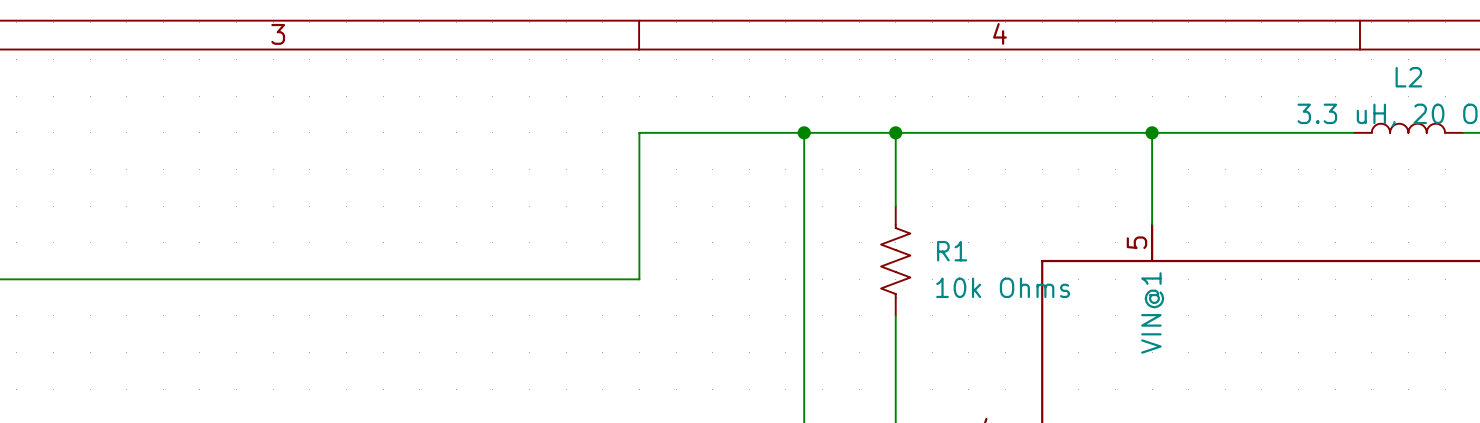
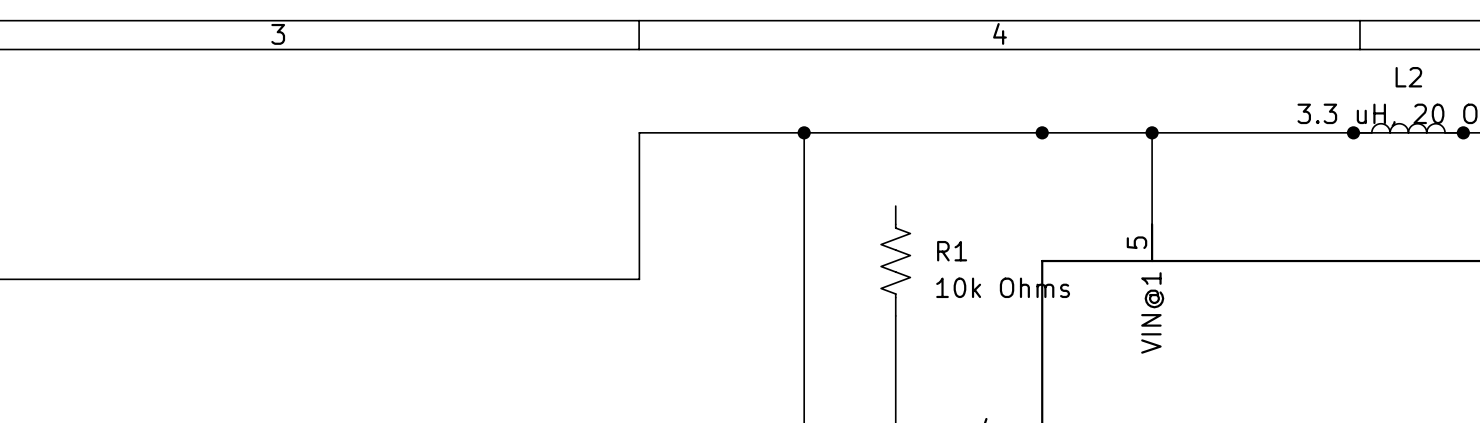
wire: (895, 132) (895, 206) -> none
junction: (895, 132) -> none
junction: none -> (1042, 132)
wire: none -> (1353, 132) (1463, 132)
junction: none -> (1353, 132)
junction: none -> (1463, 132)

